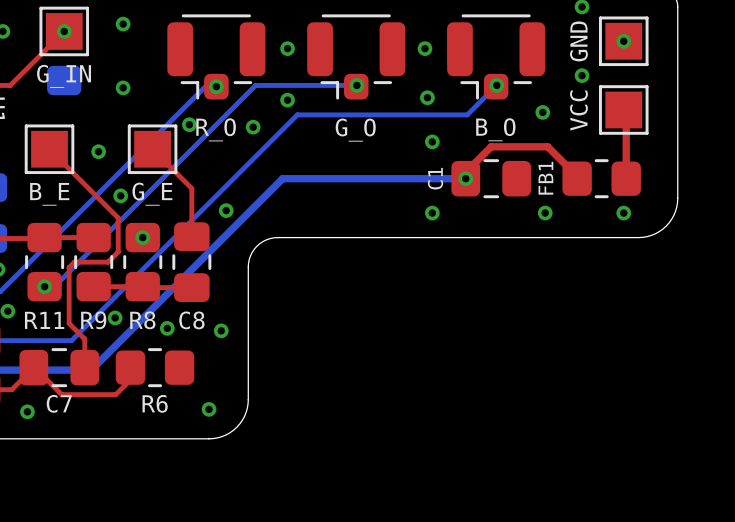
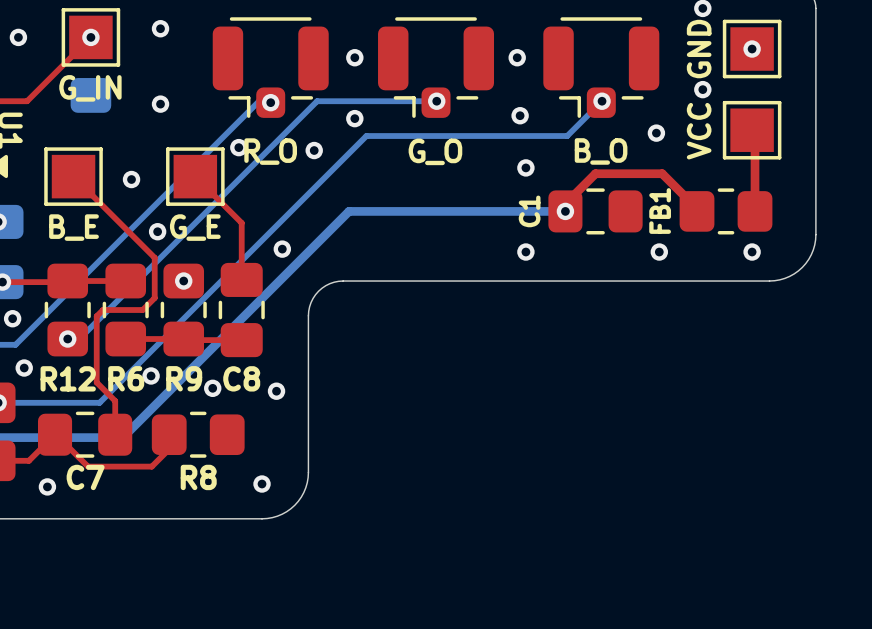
R11 name: R11 (44, 320) -> R12 (68, 378)
R9 name: R9 (93, 320) -> R6 (126, 378)
R8 name: R8 (142, 320) -> R9 (184, 378)
R6 name: R6 (155, 403) -> R8 (198, 477)

